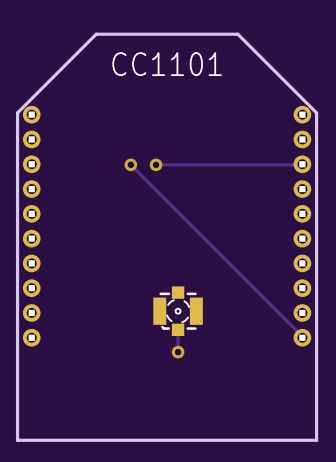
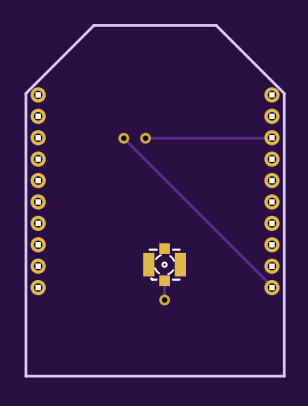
text: CC1101 (167, 64) -> none

